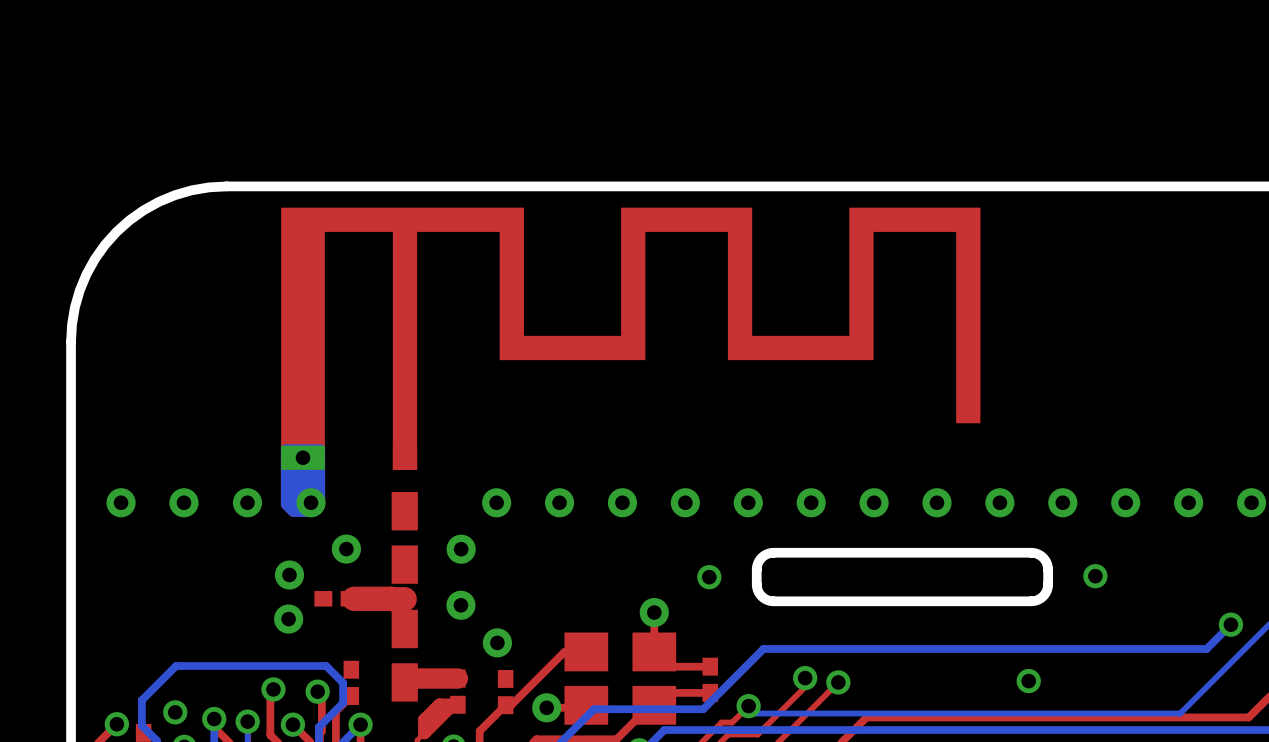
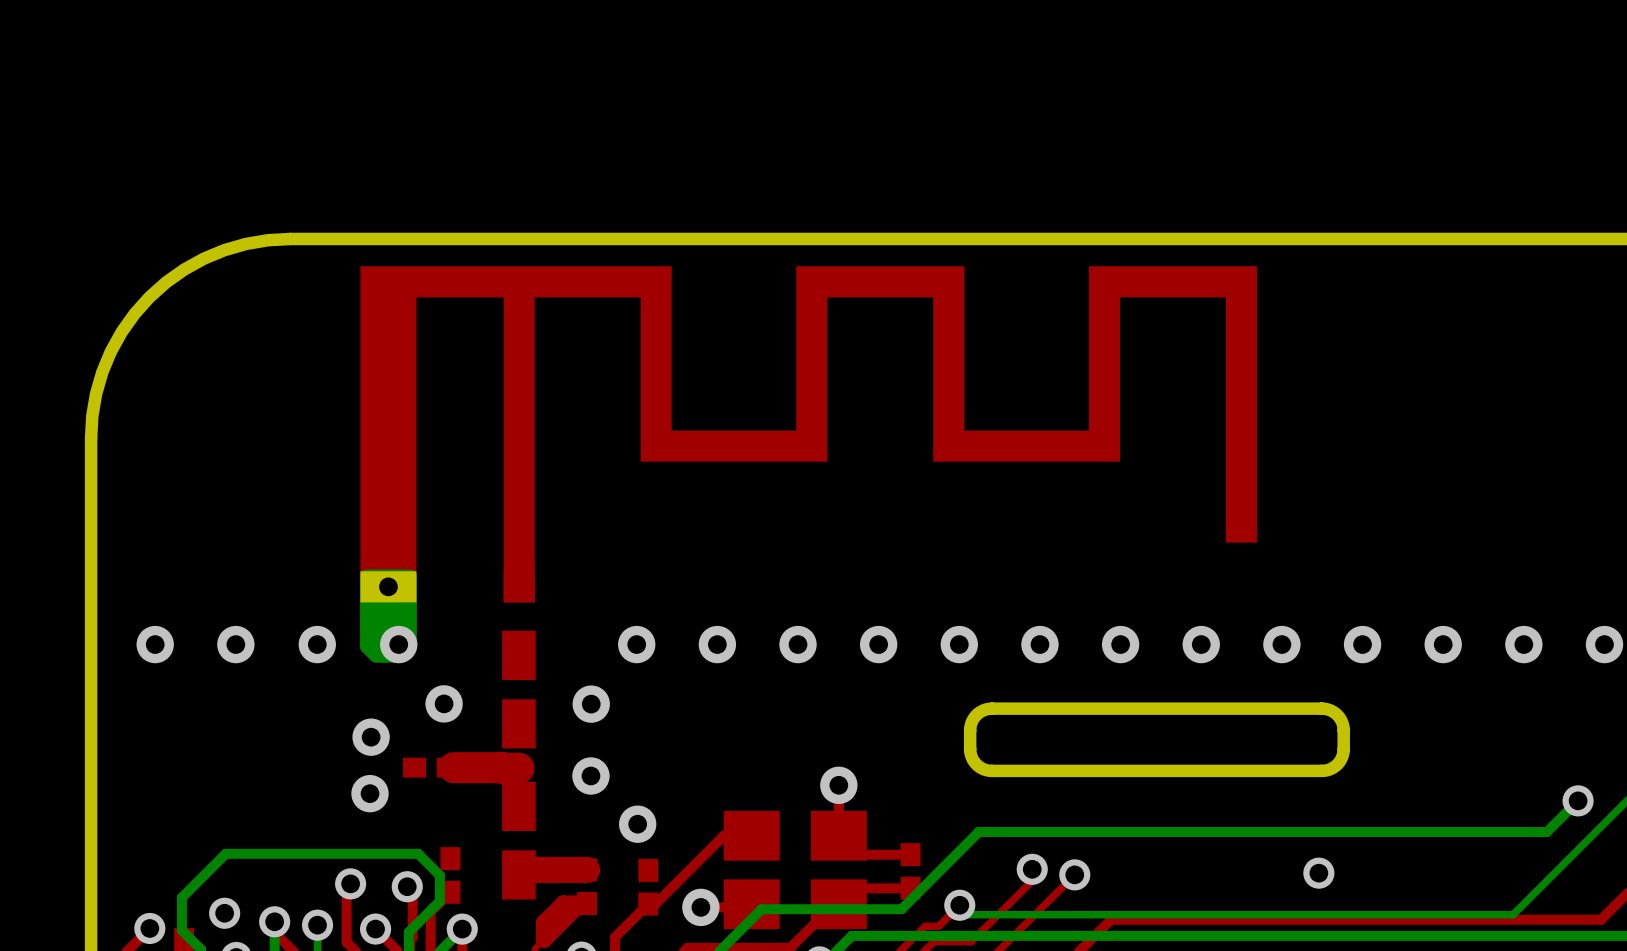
via: (1095, 576) -> none
via: (709, 577) -> none

